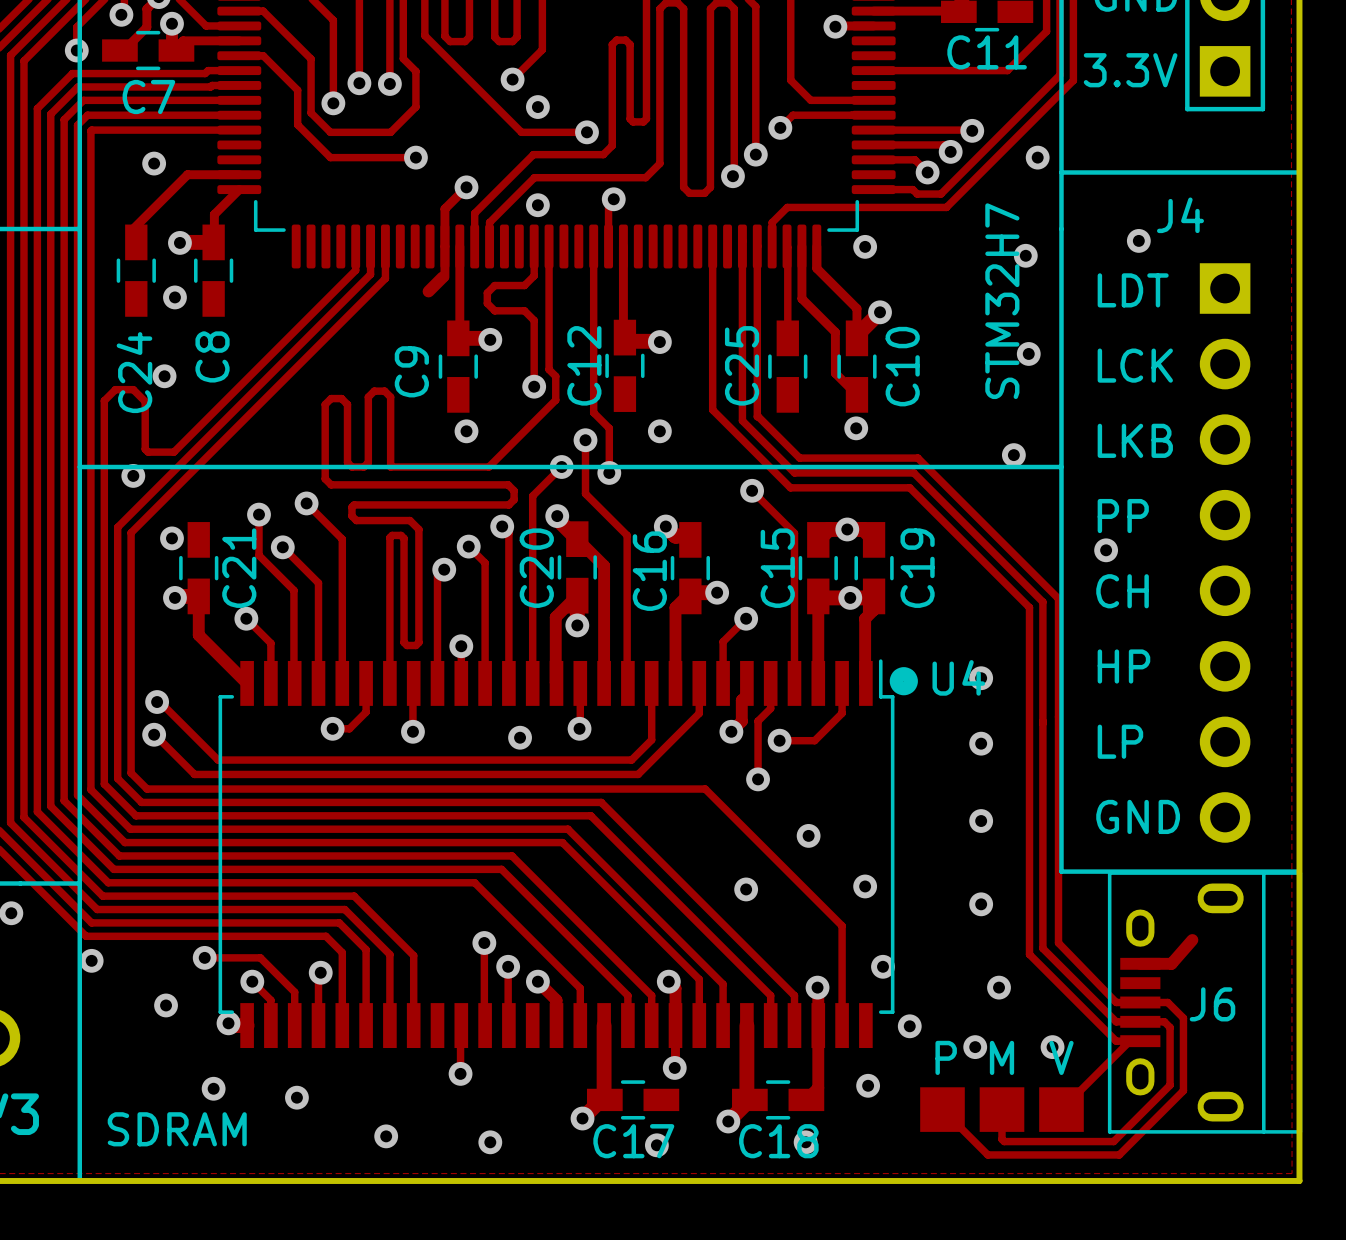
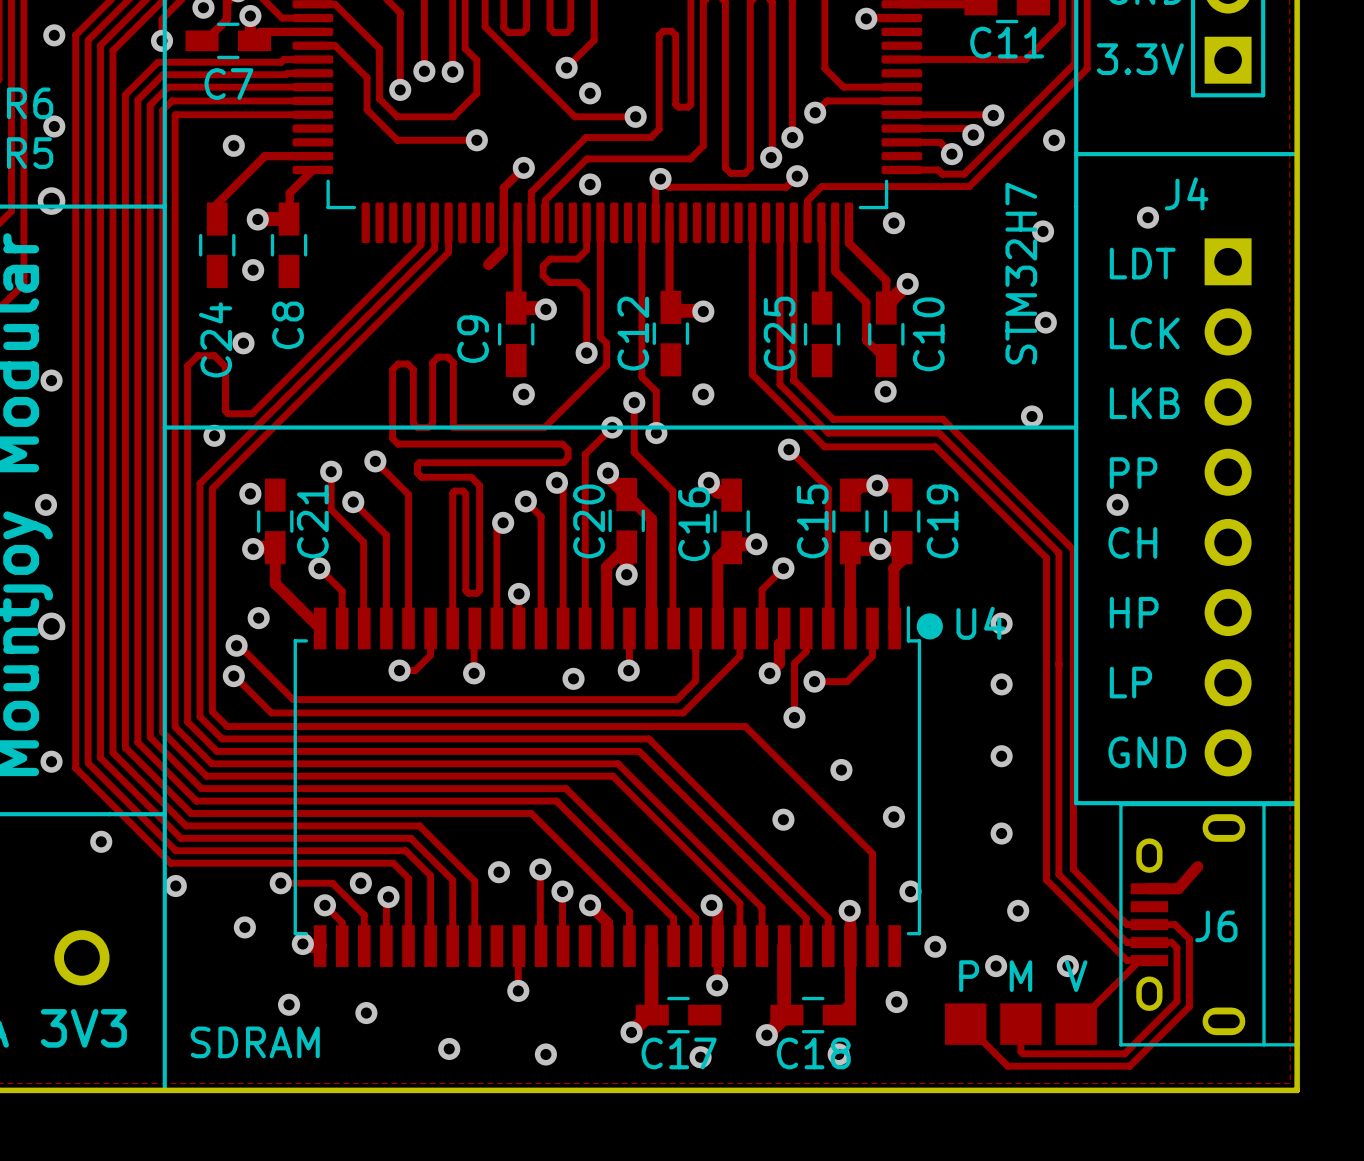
track: none -> (797, 176) (786, 187) (668, 187) (660, 178)
via: none -> (797, 176)
via: none -> (258, 618)
via: none -> (498, 872)
via: none -> (360, 883)

